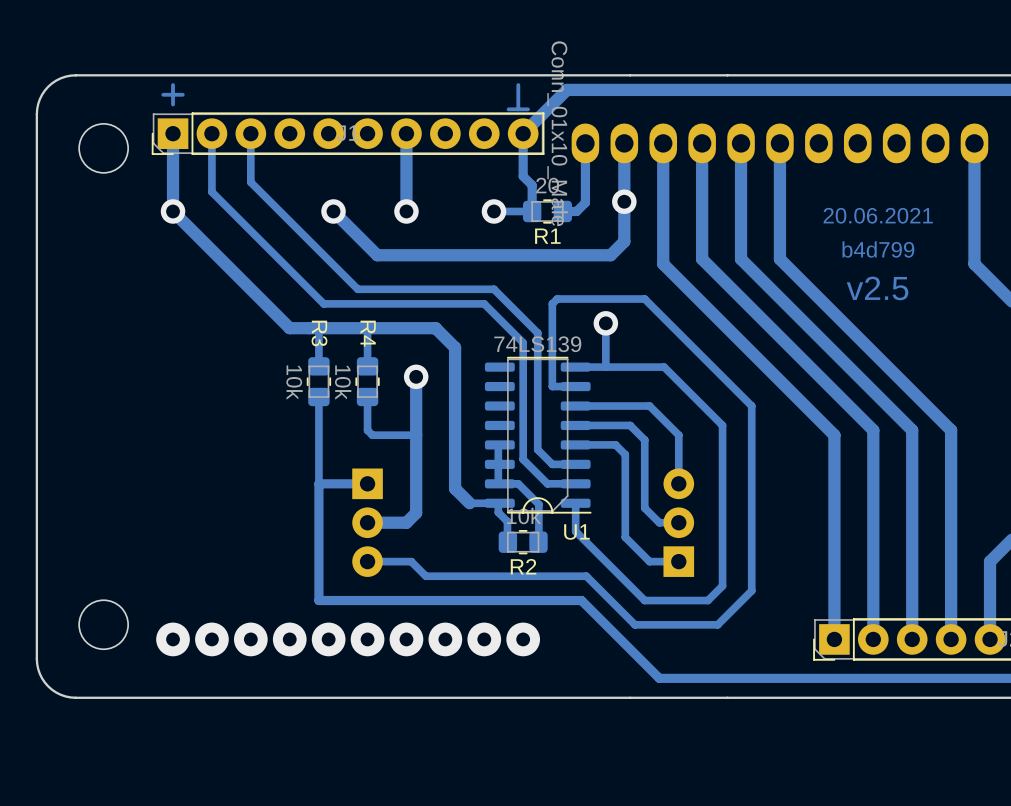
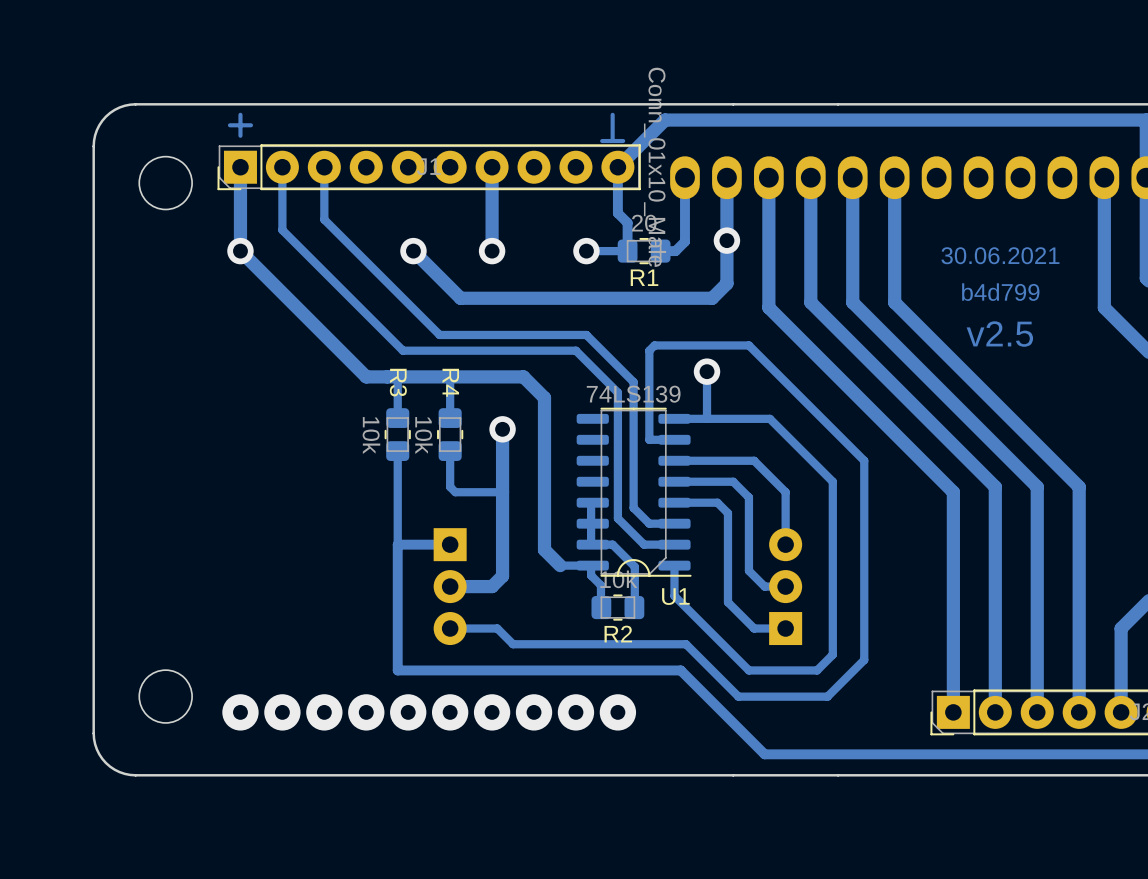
text: 20.06.2021 (878, 215) -> 30.06.2021 (1000, 255)

